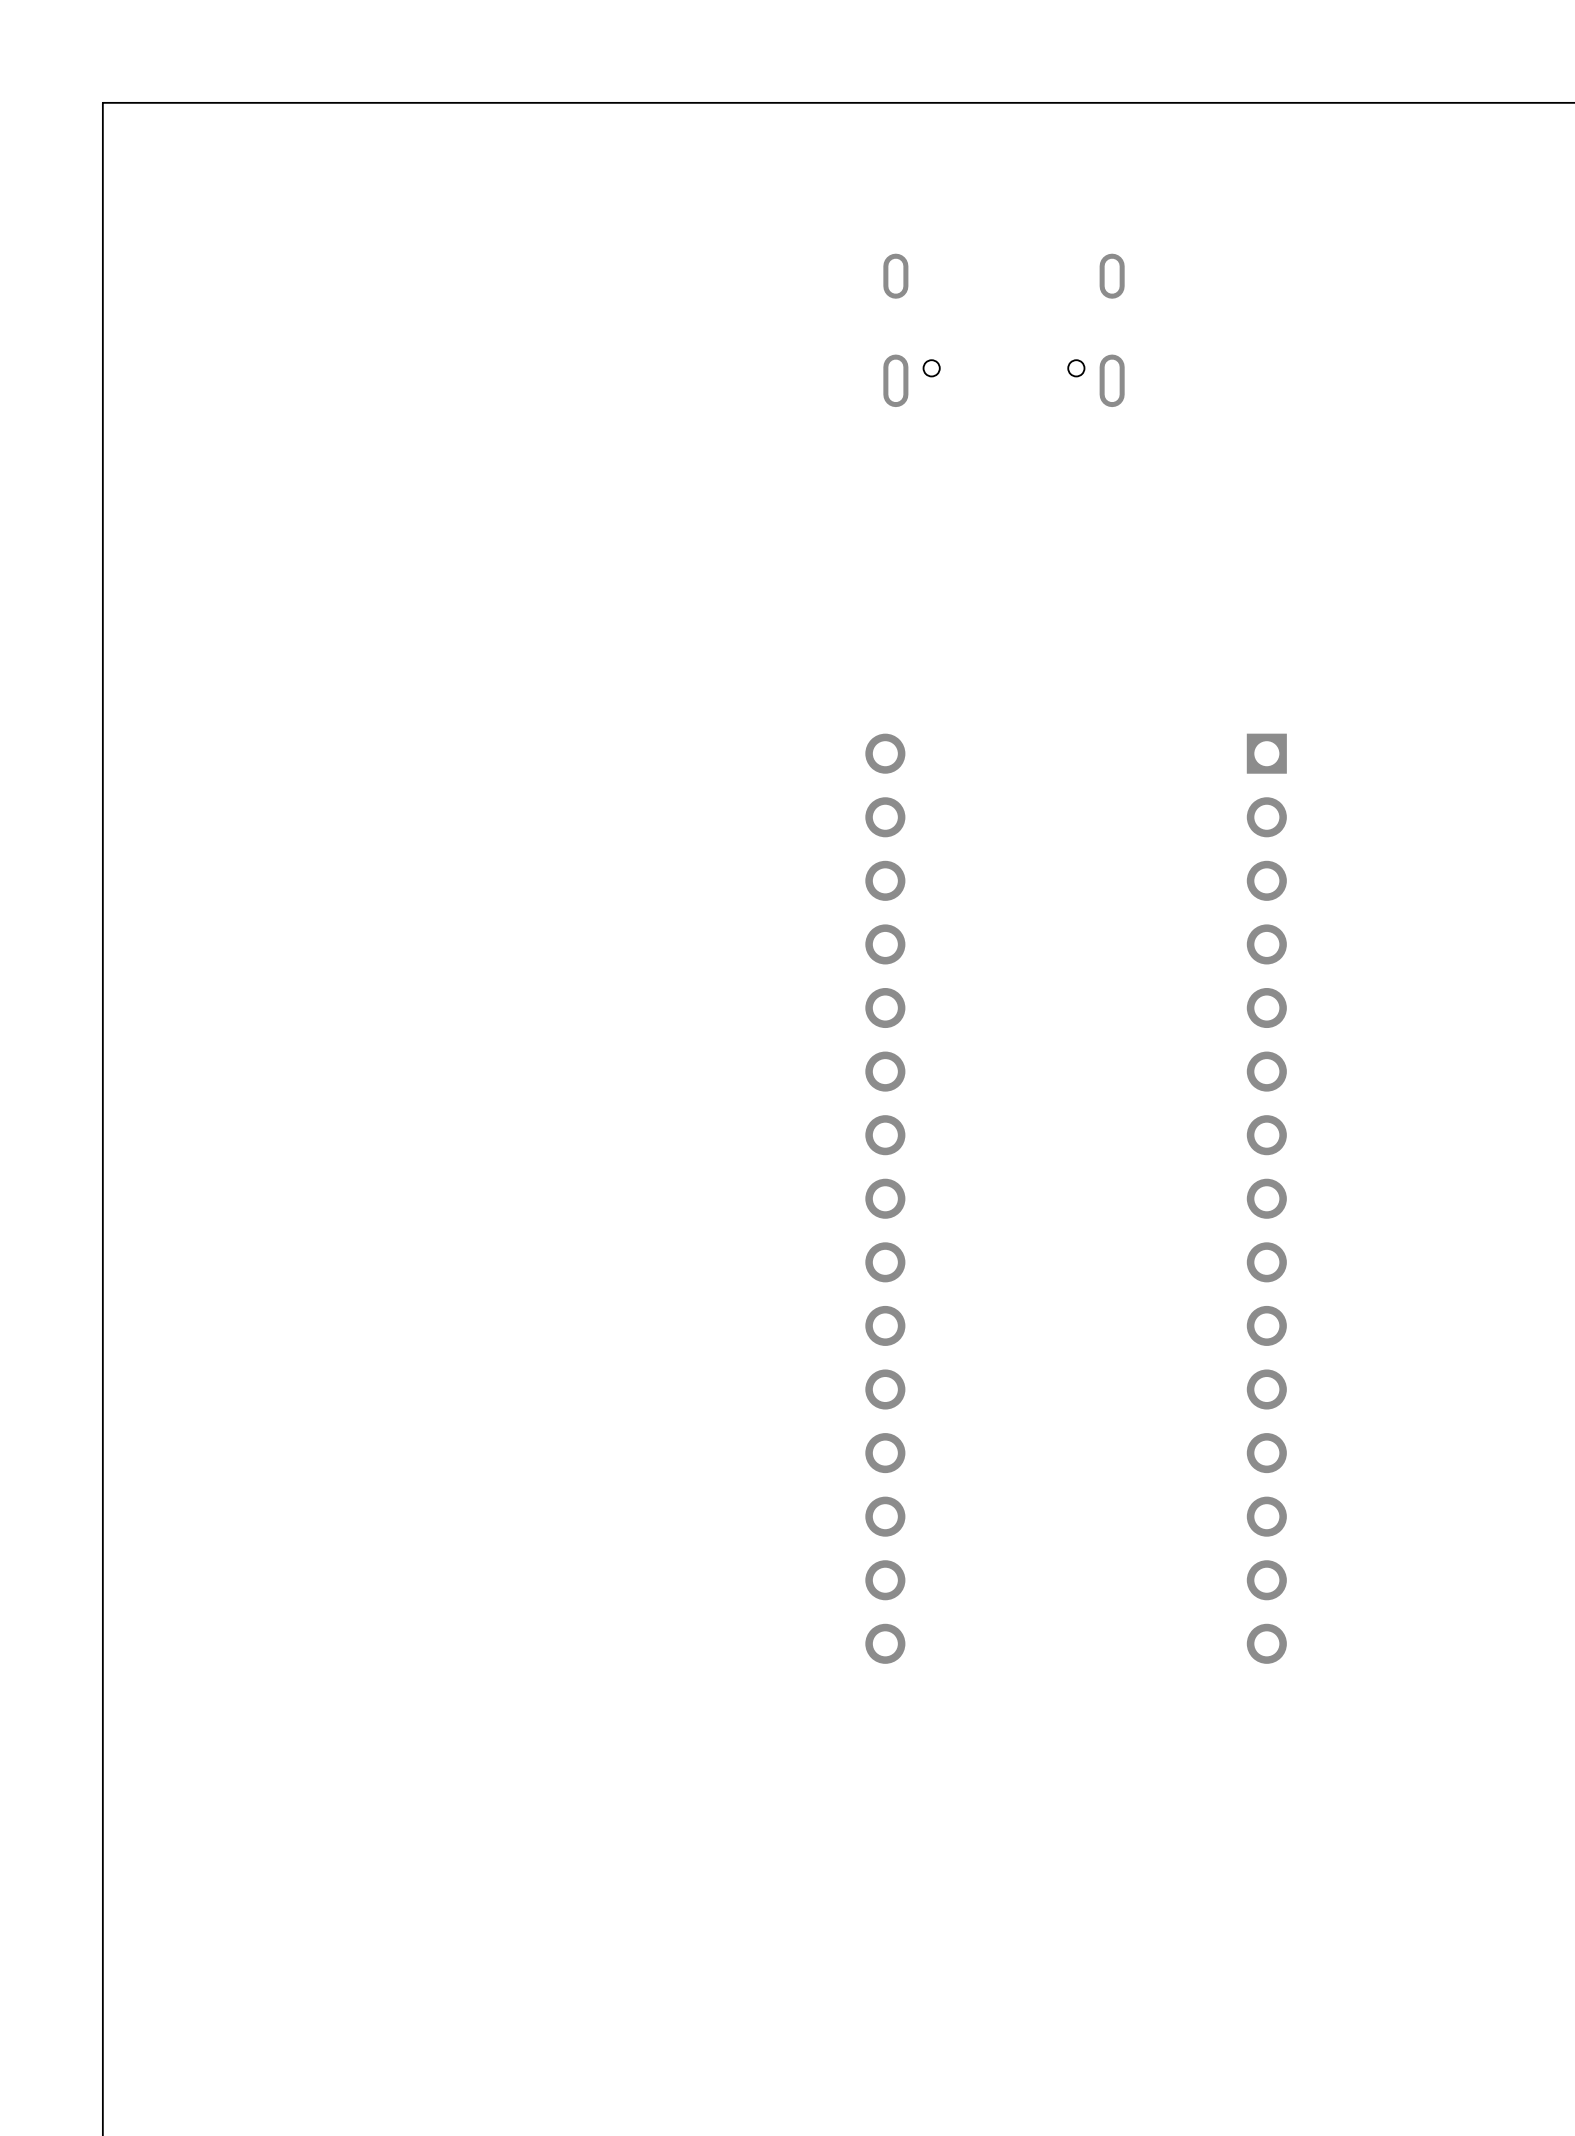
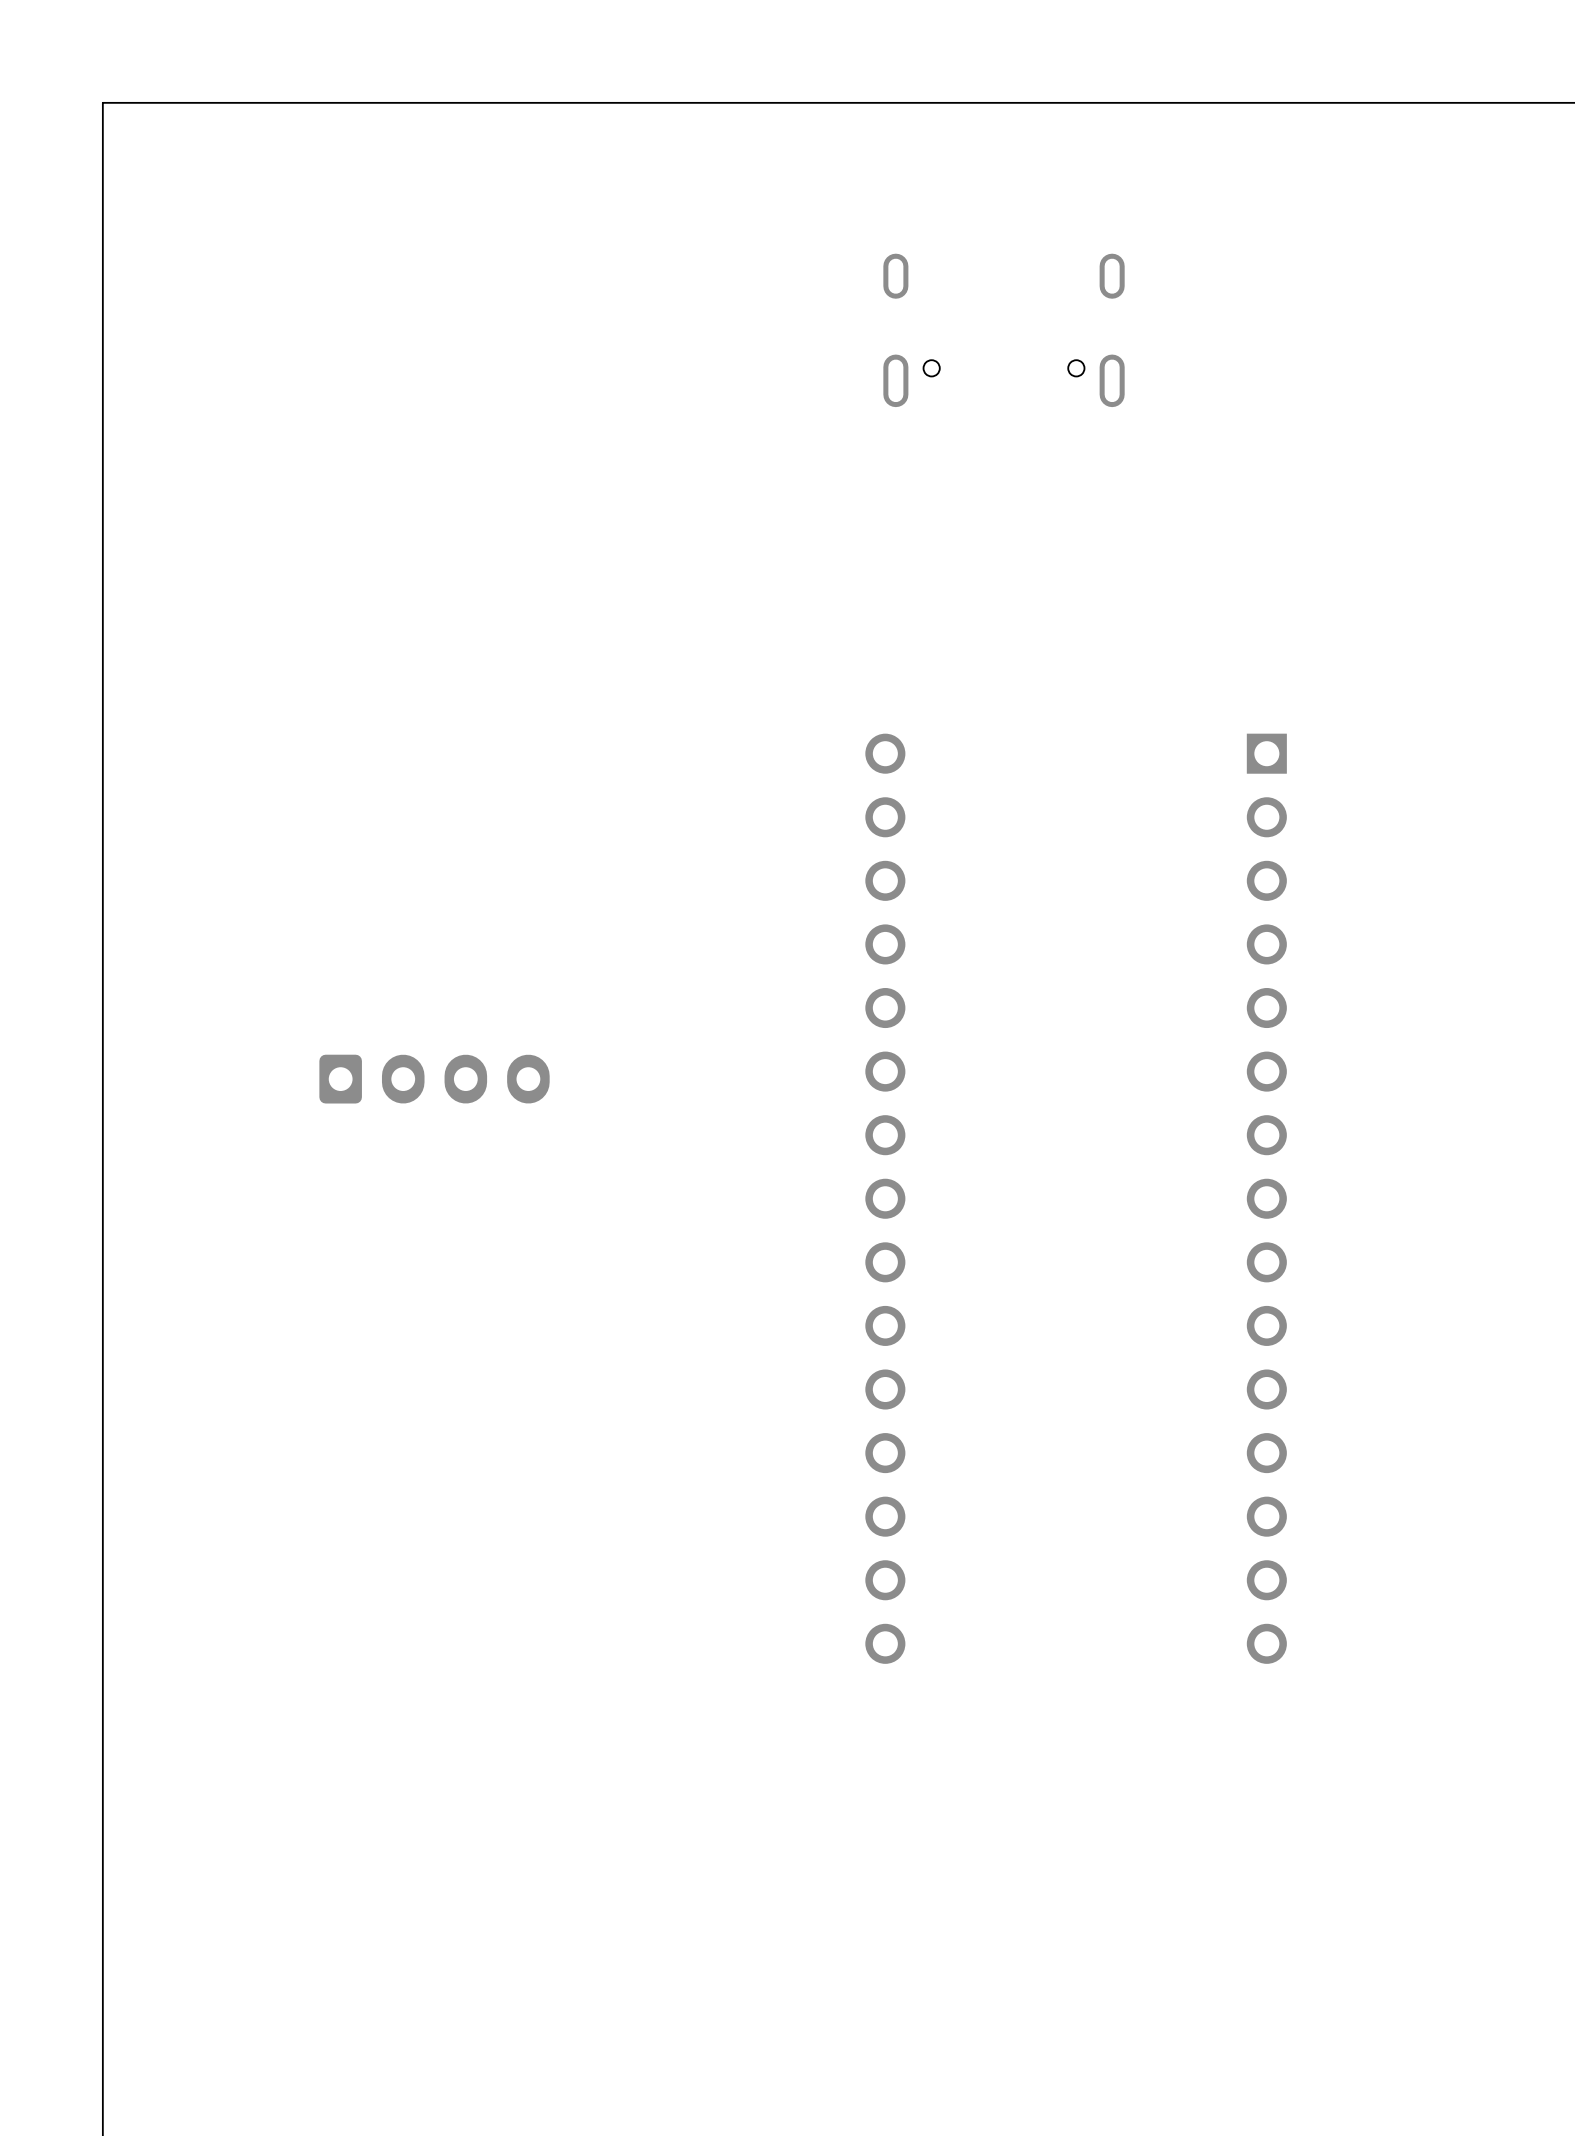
part: none -> (434, 1079)

